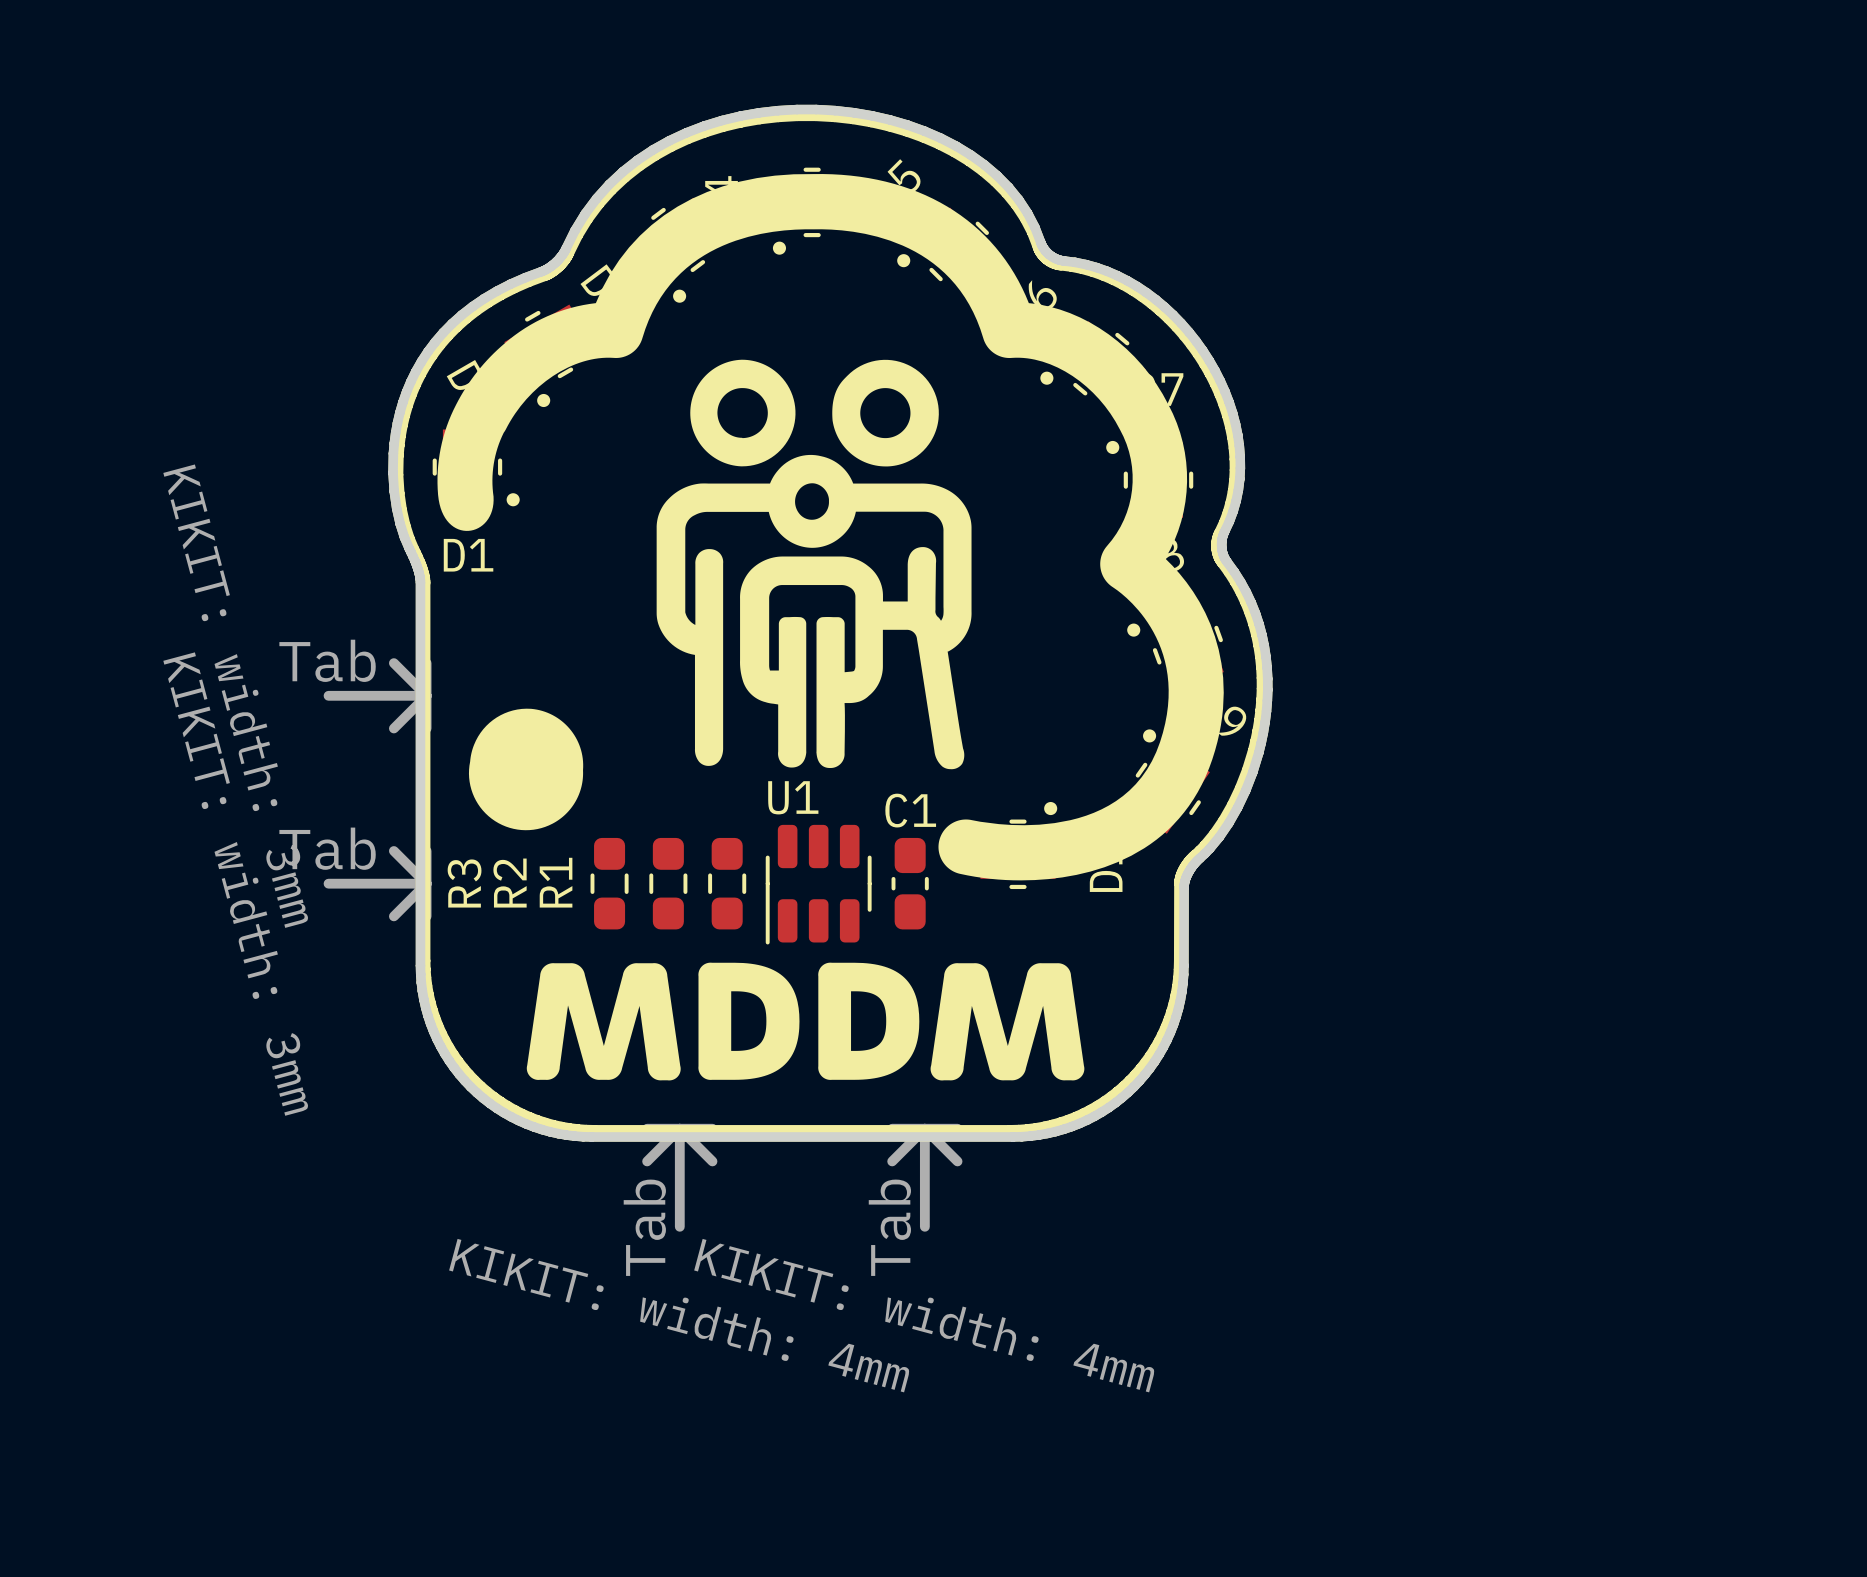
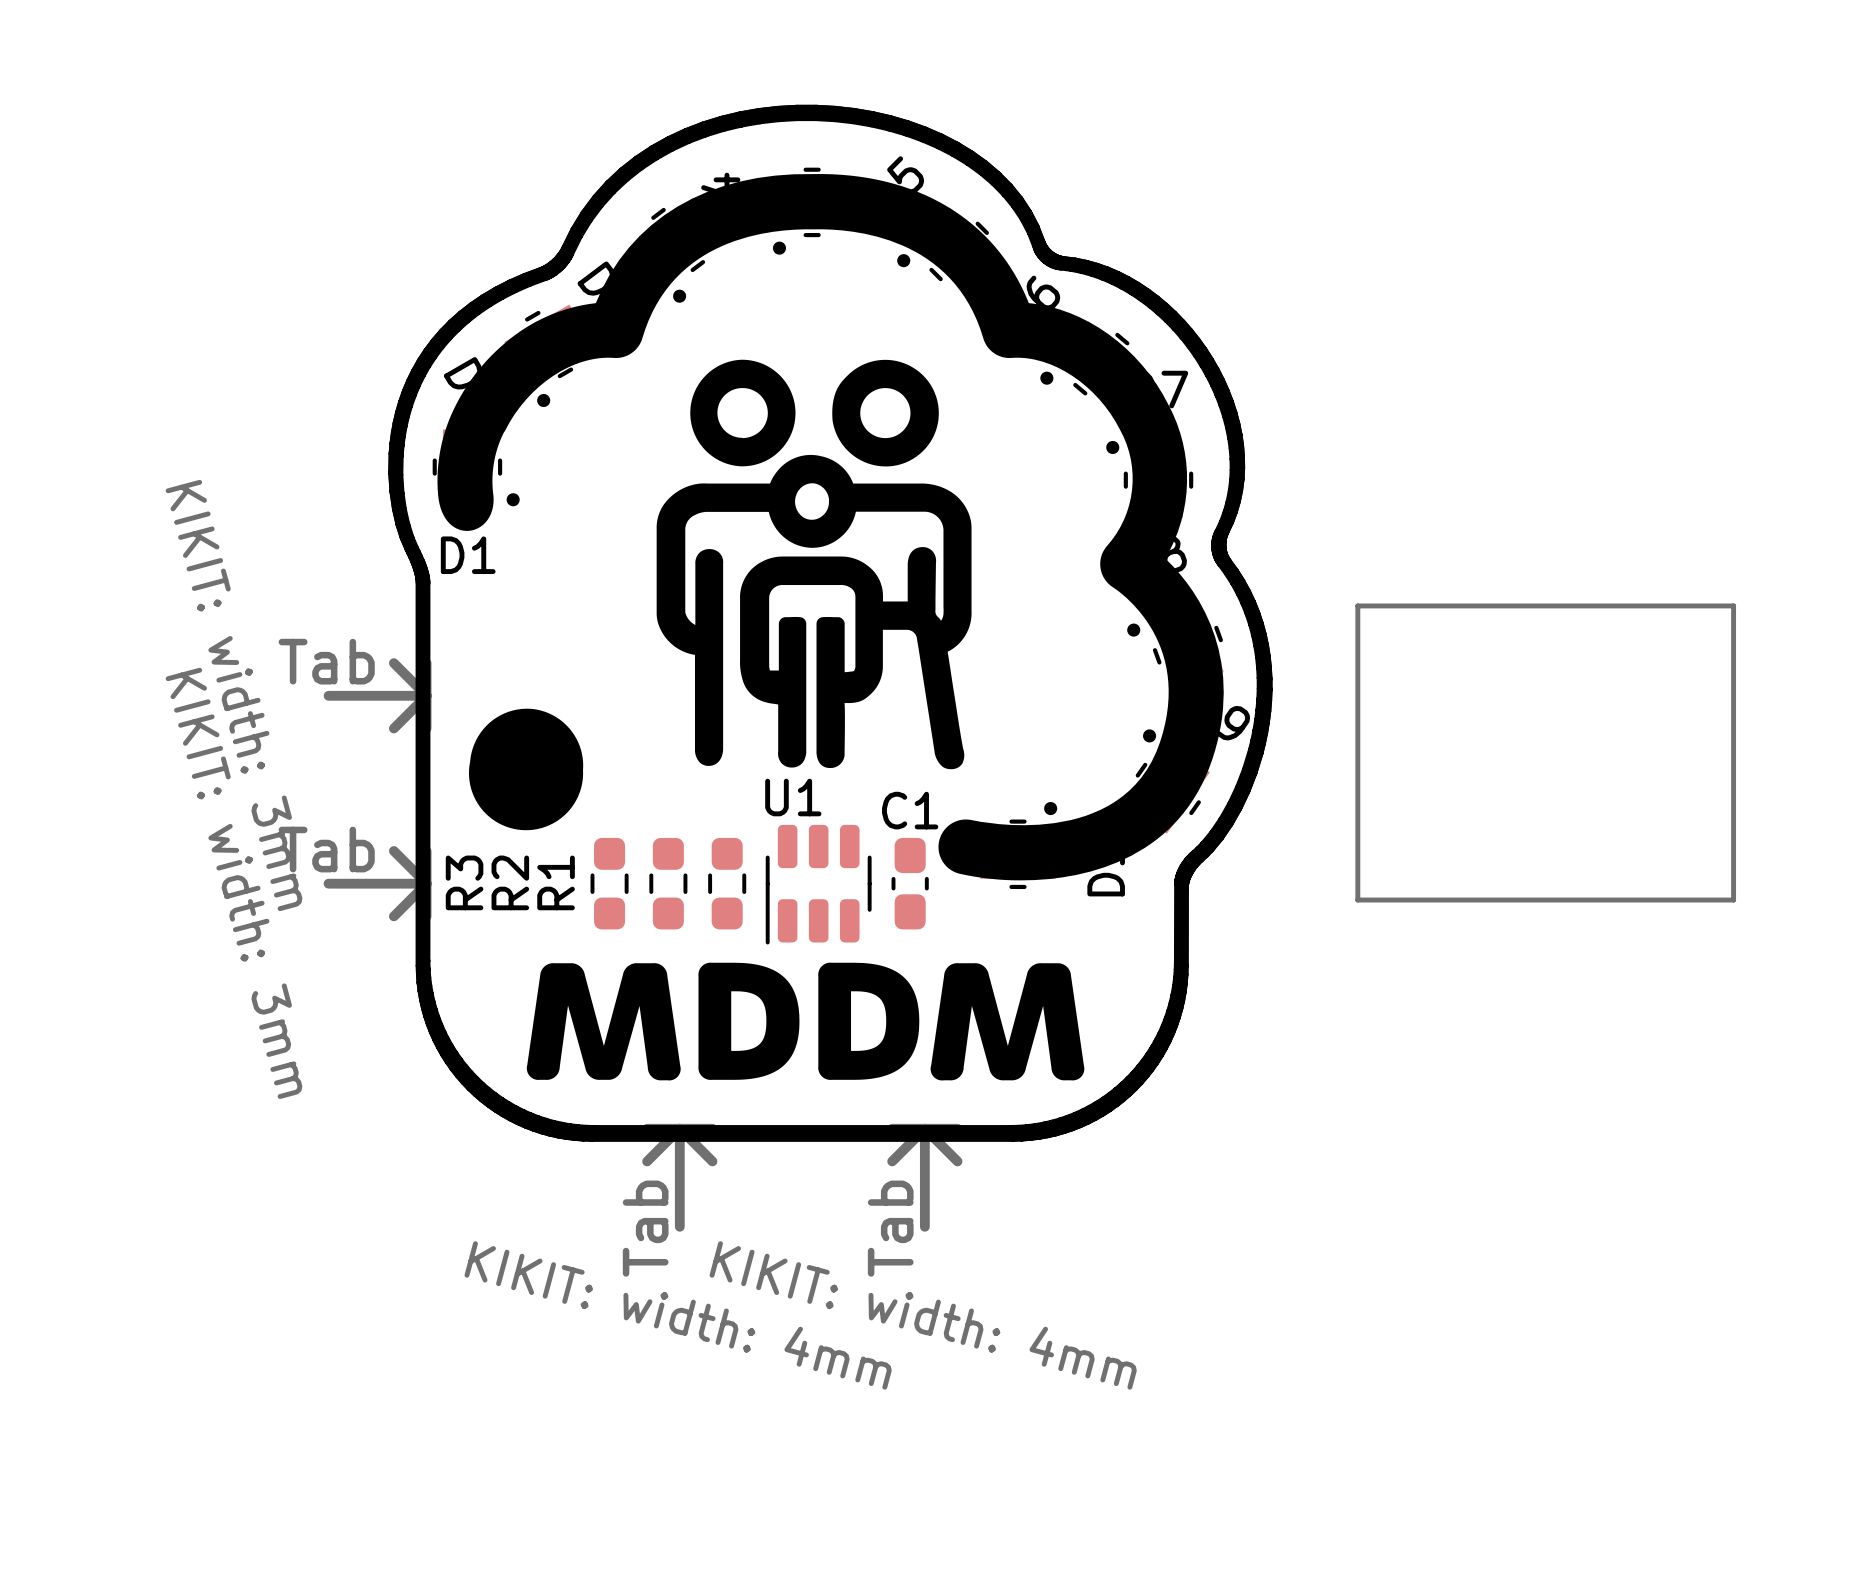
line: none -> (1357, 605) (1357, 900) (1733, 900) (1733, 605) (1357, 605)

